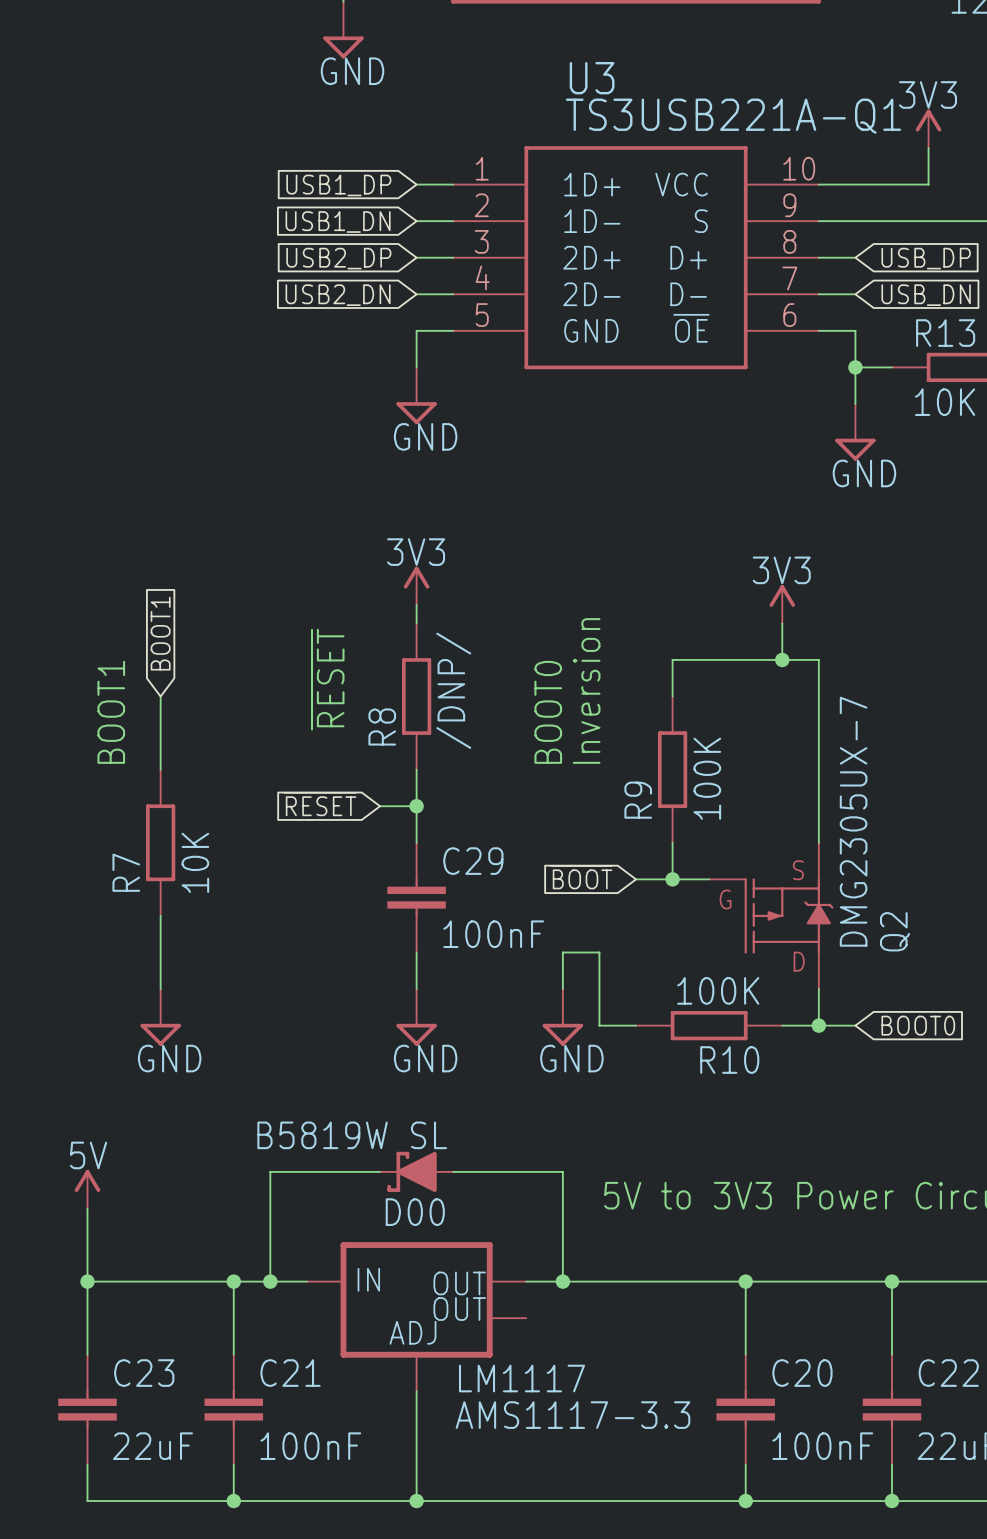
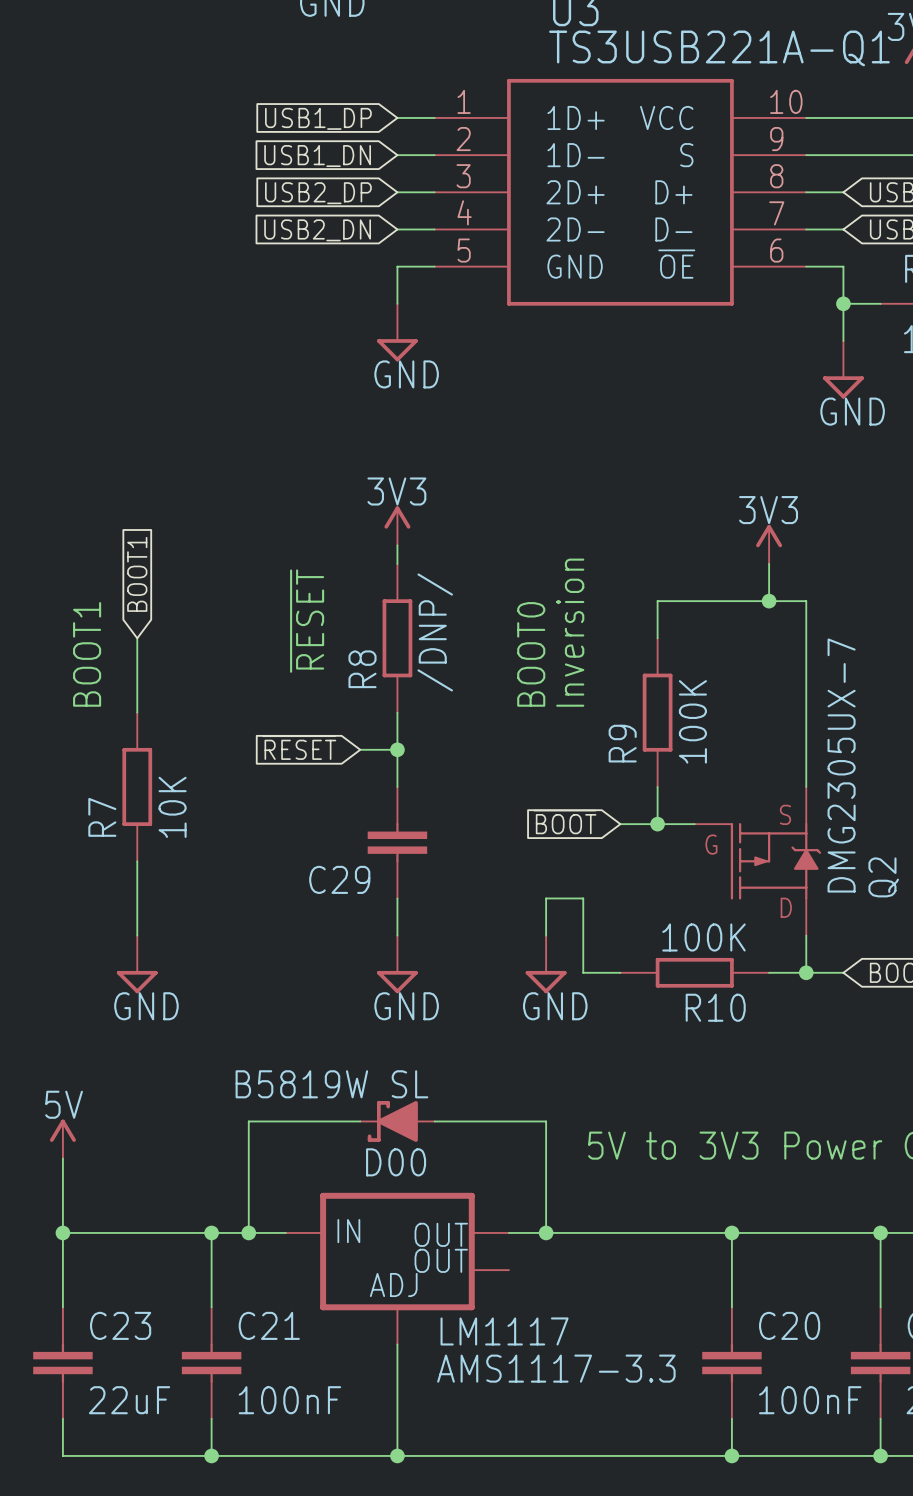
C29 name position: C29 (473, 861) -> C29 (339, 879)
C29 value: 100nF (493, 934) -> none

